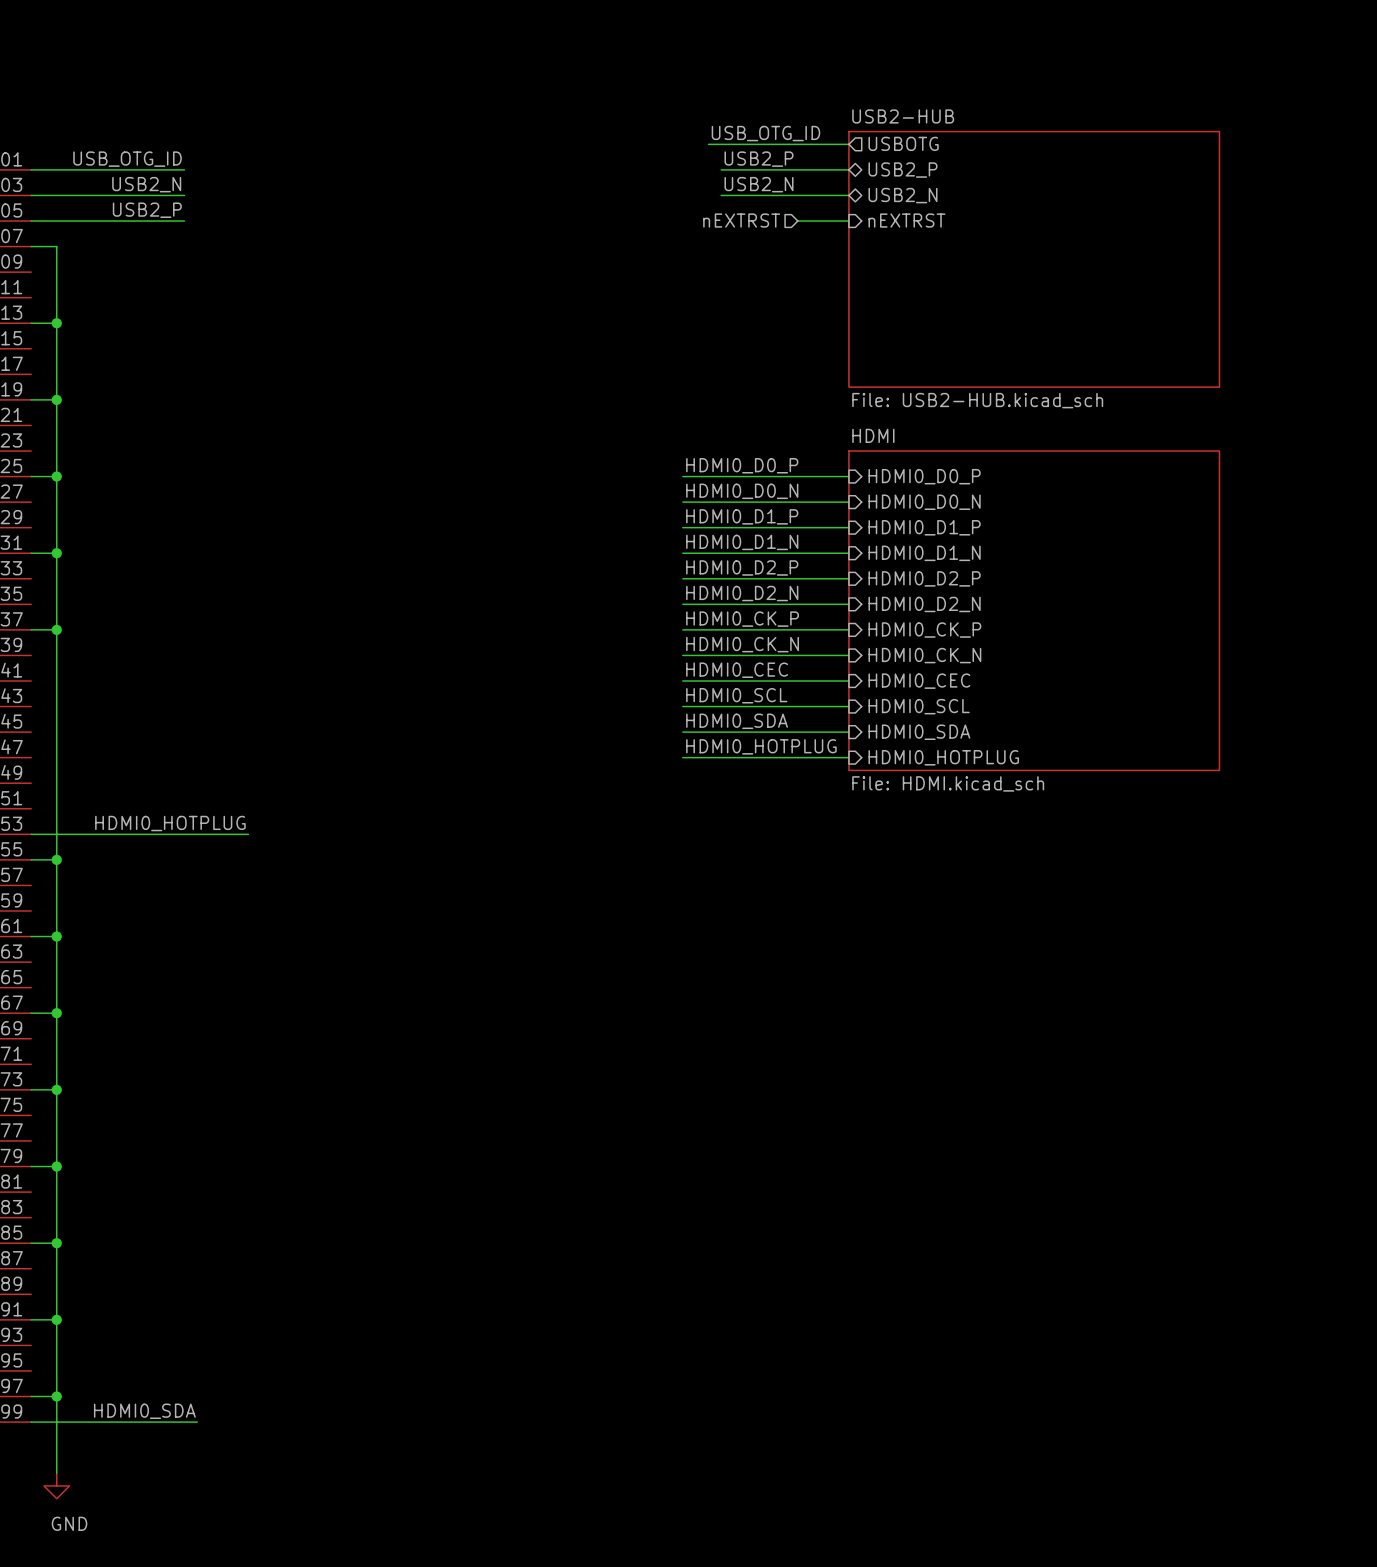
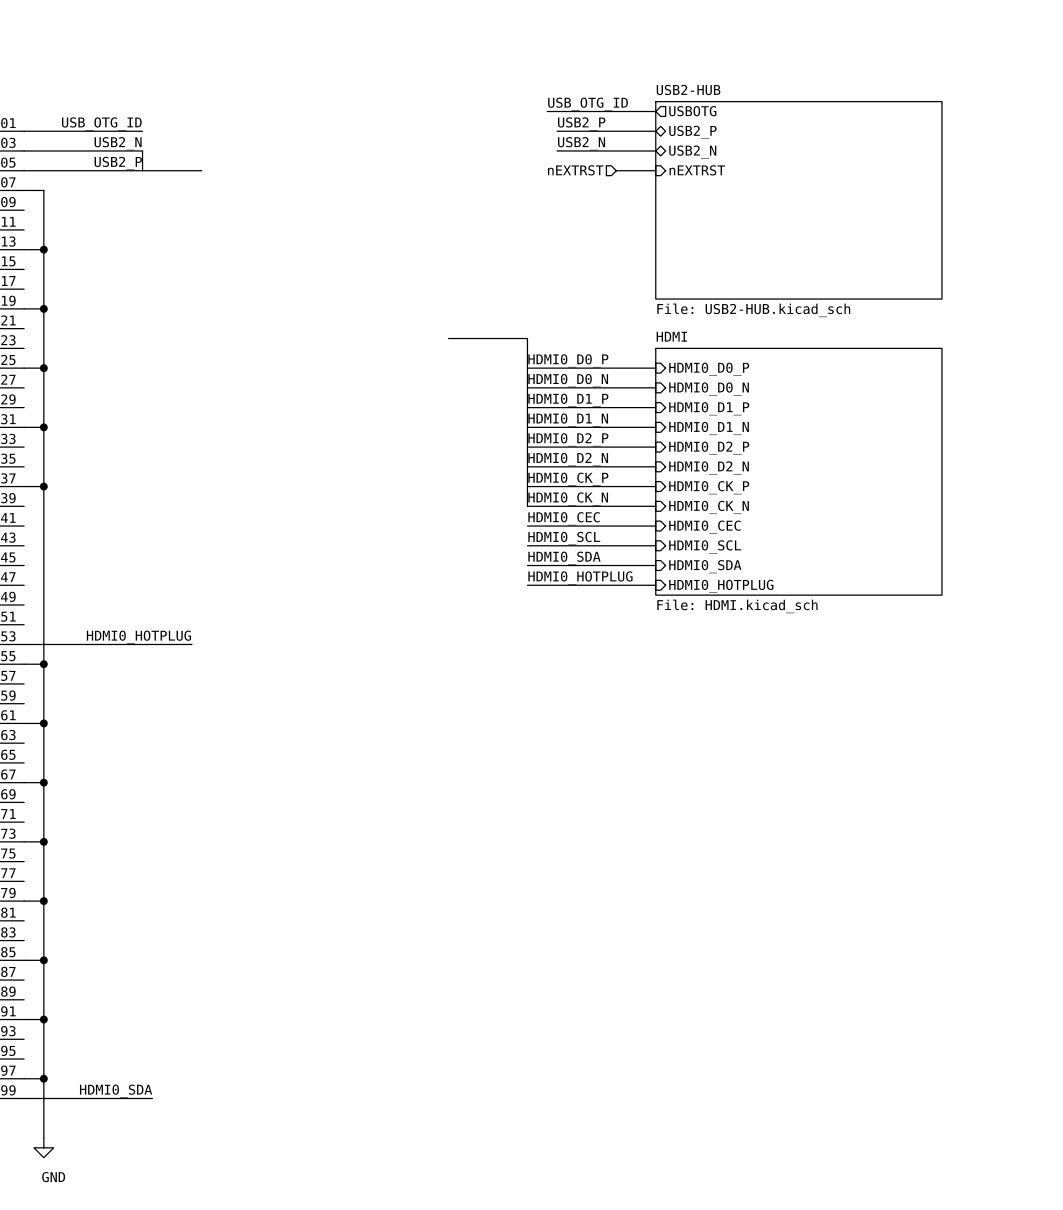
bus: none -> (142, 150) (142, 170) (201, 170)
bus: none -> (448, 338) (527, 338) (527, 506)

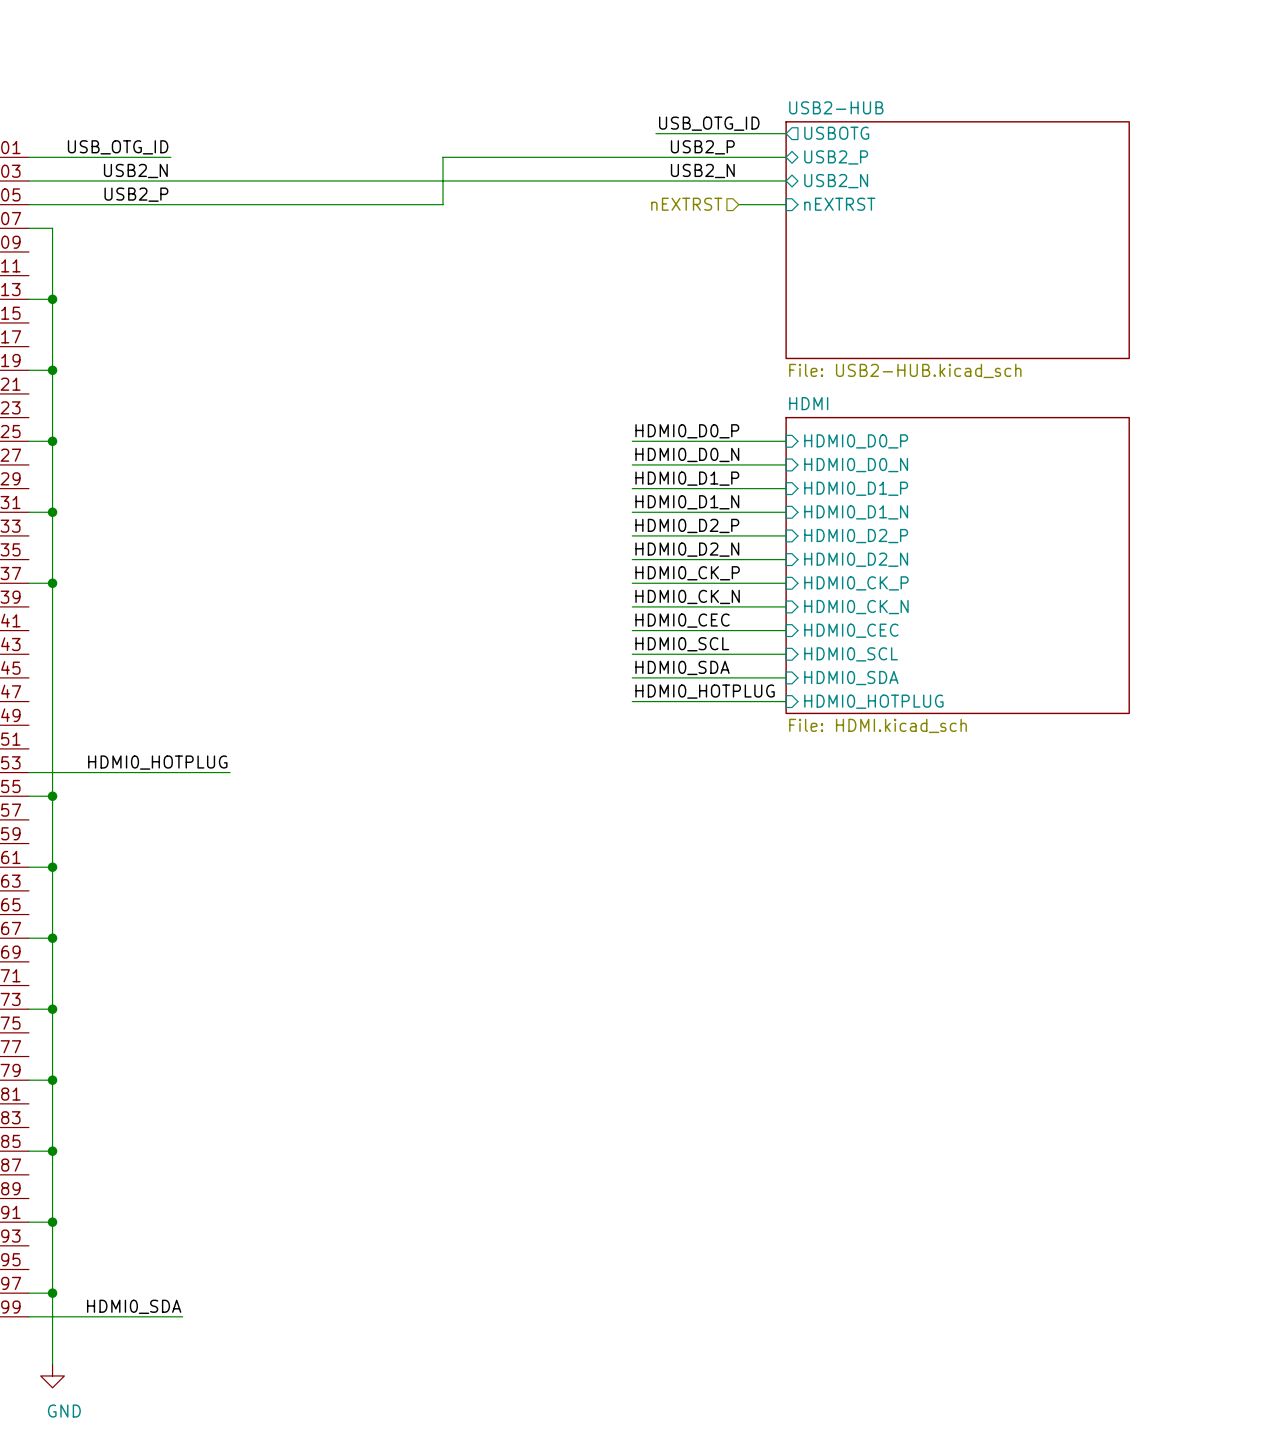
wire: none -> (667, 157) (442, 157) (442, 204) (170, 204)
wire: none -> (170, 180) (667, 180)
bus: (142, 150) (142, 170) (201, 170) -> none
bus: (448, 338) (527, 338) (527, 506) -> none

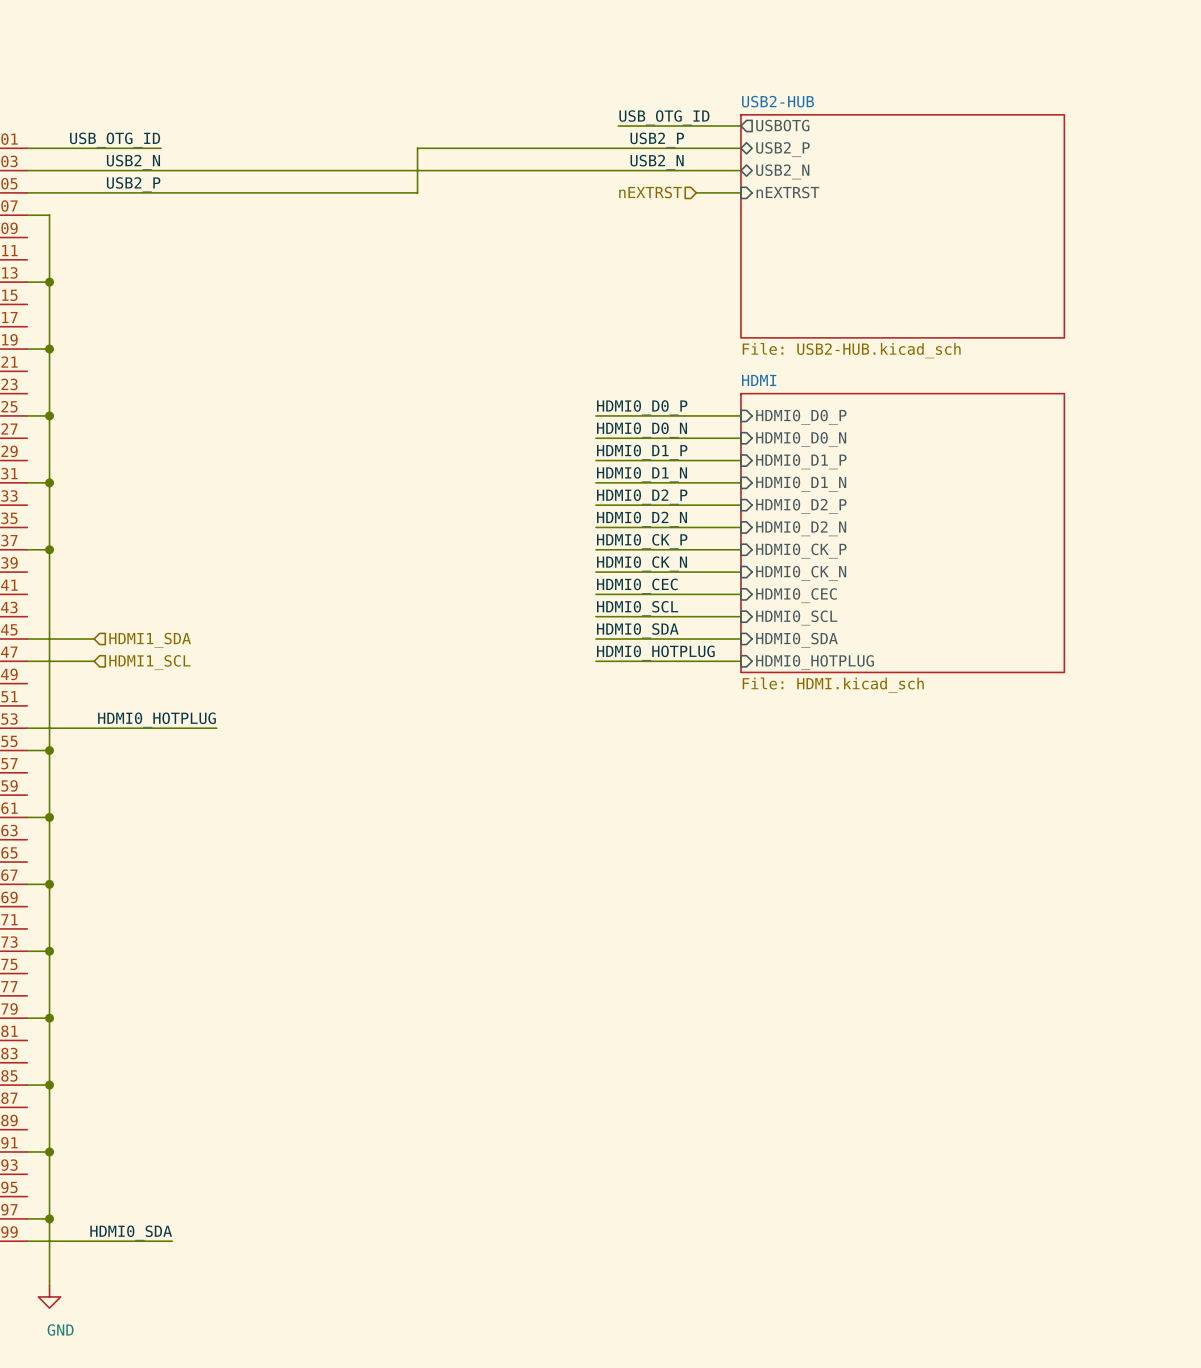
wire: none -> (27, 638) (94, 638)
hierarchical label: none -> HDMI1_SDA (150, 640)
wire: none -> (27, 661) (94, 661)
hierarchical label: none -> HDMI1_SCL (149, 662)

